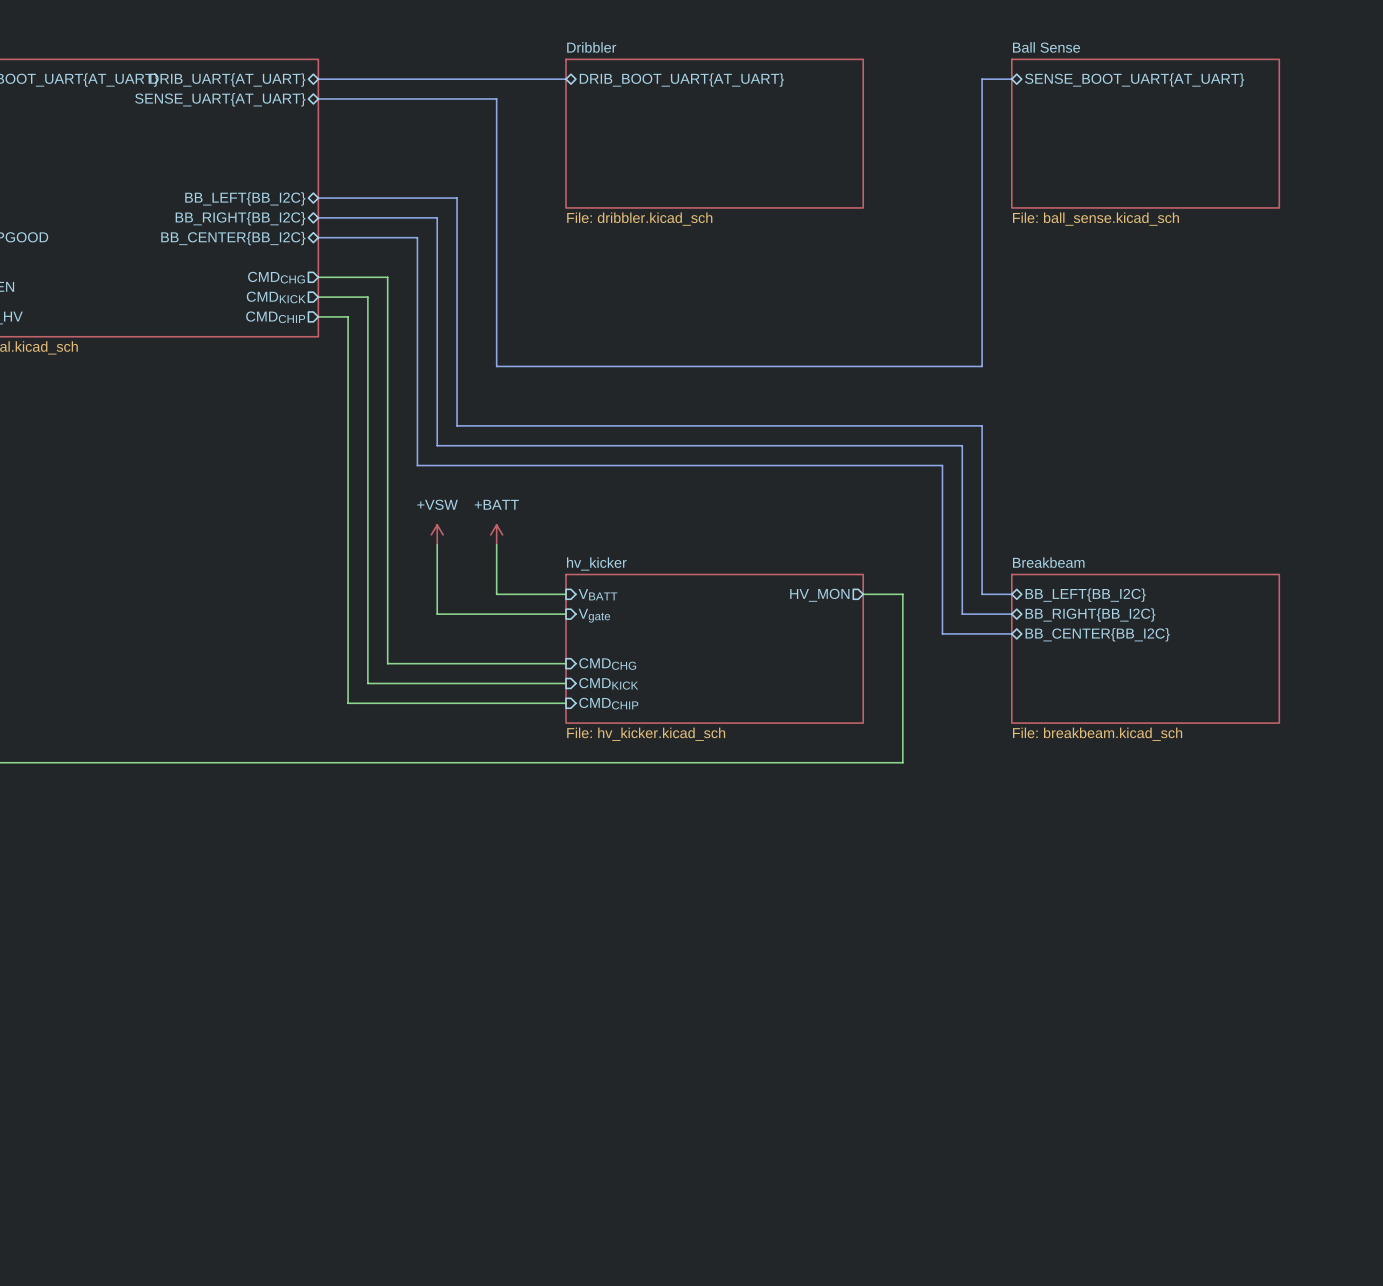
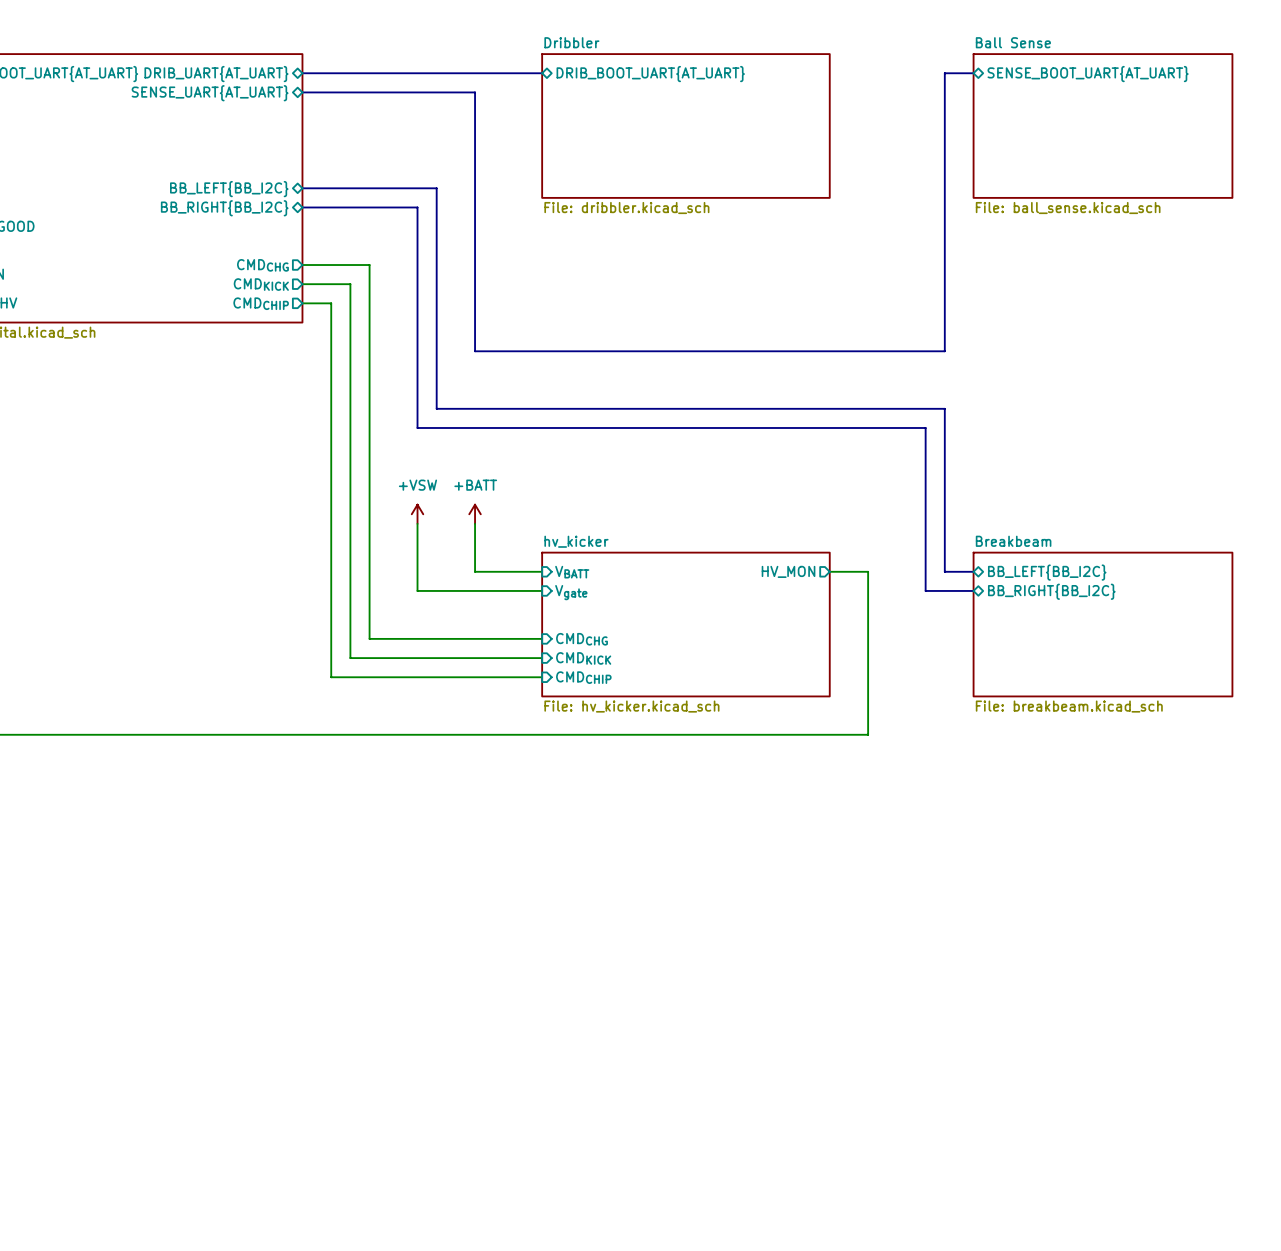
bus: (318, 237) (417, 237) (417, 465) (942, 465) (942, 633) (1011, 633) -> none
sheet pin: BB_CENTER{BB_I2C} (233, 238) -> none
sheet pin: BB_CENTER{BB_I2C} (1097, 634) -> none

